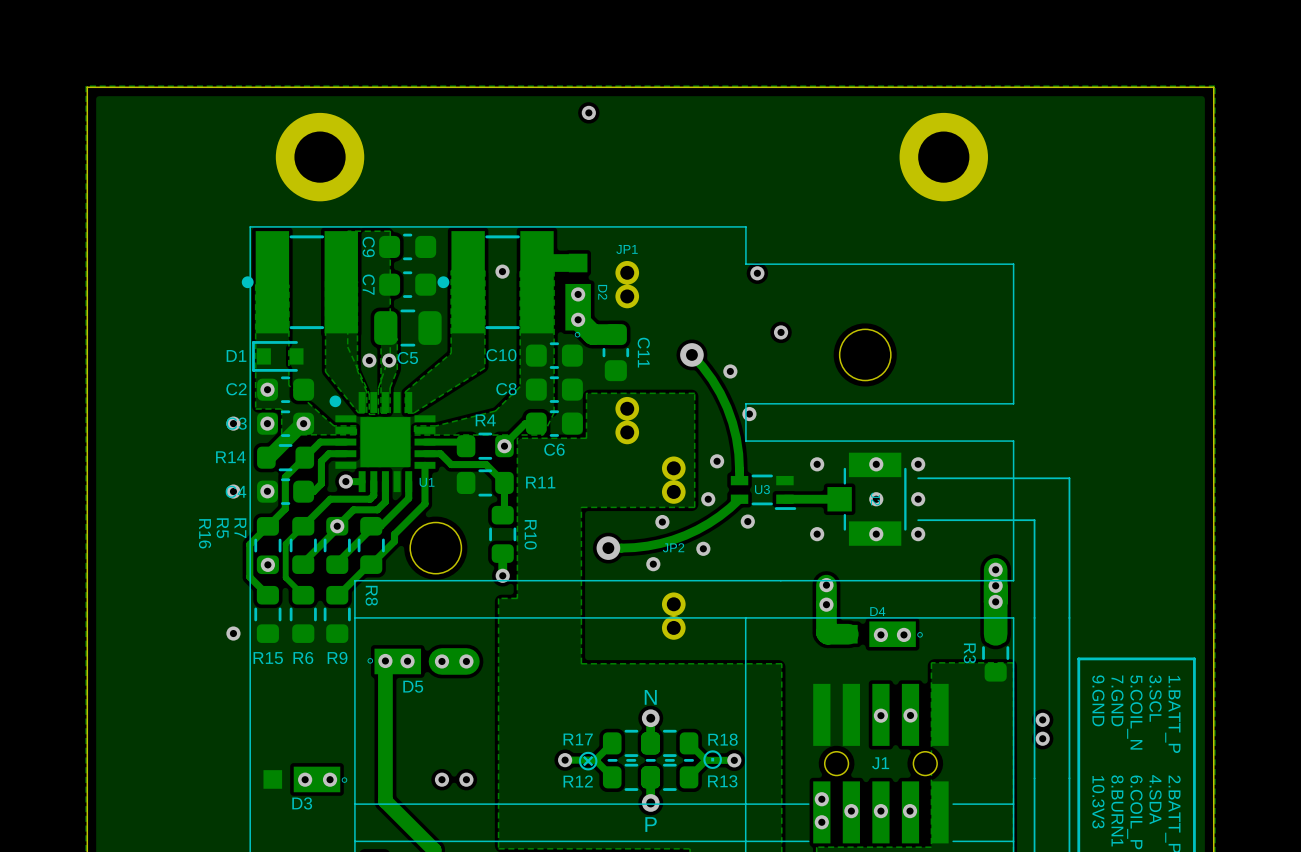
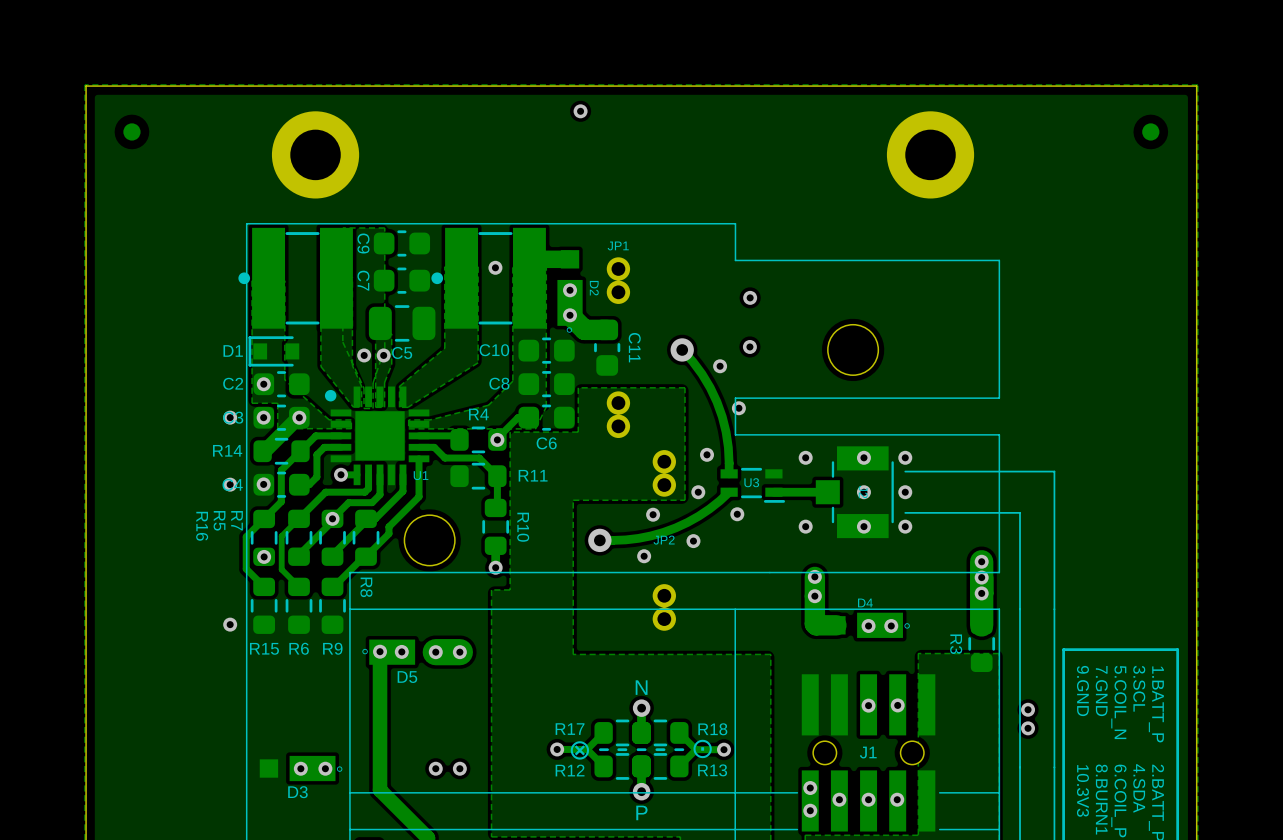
part: none -> (131, 131)
part: none -> (1150, 131)
via: (757, 273) -> none
via: none -> (750, 297)
via: (781, 332) -> none
via: none -> (749, 346)

